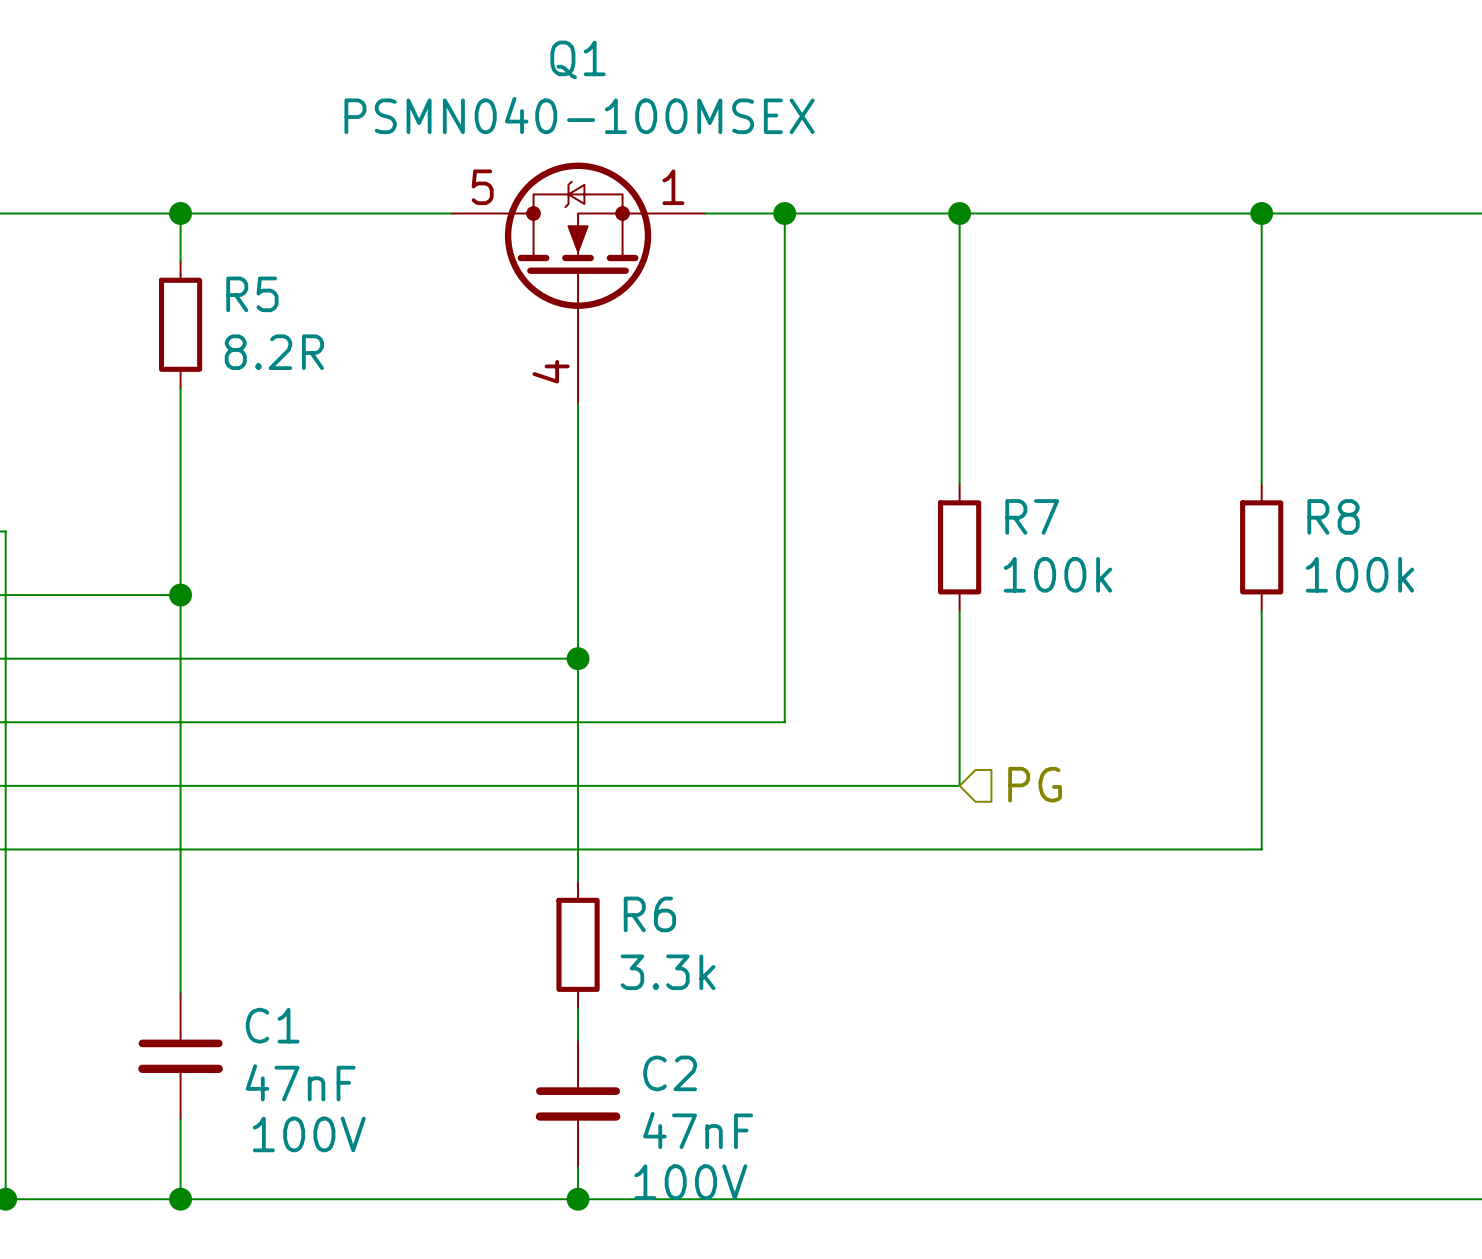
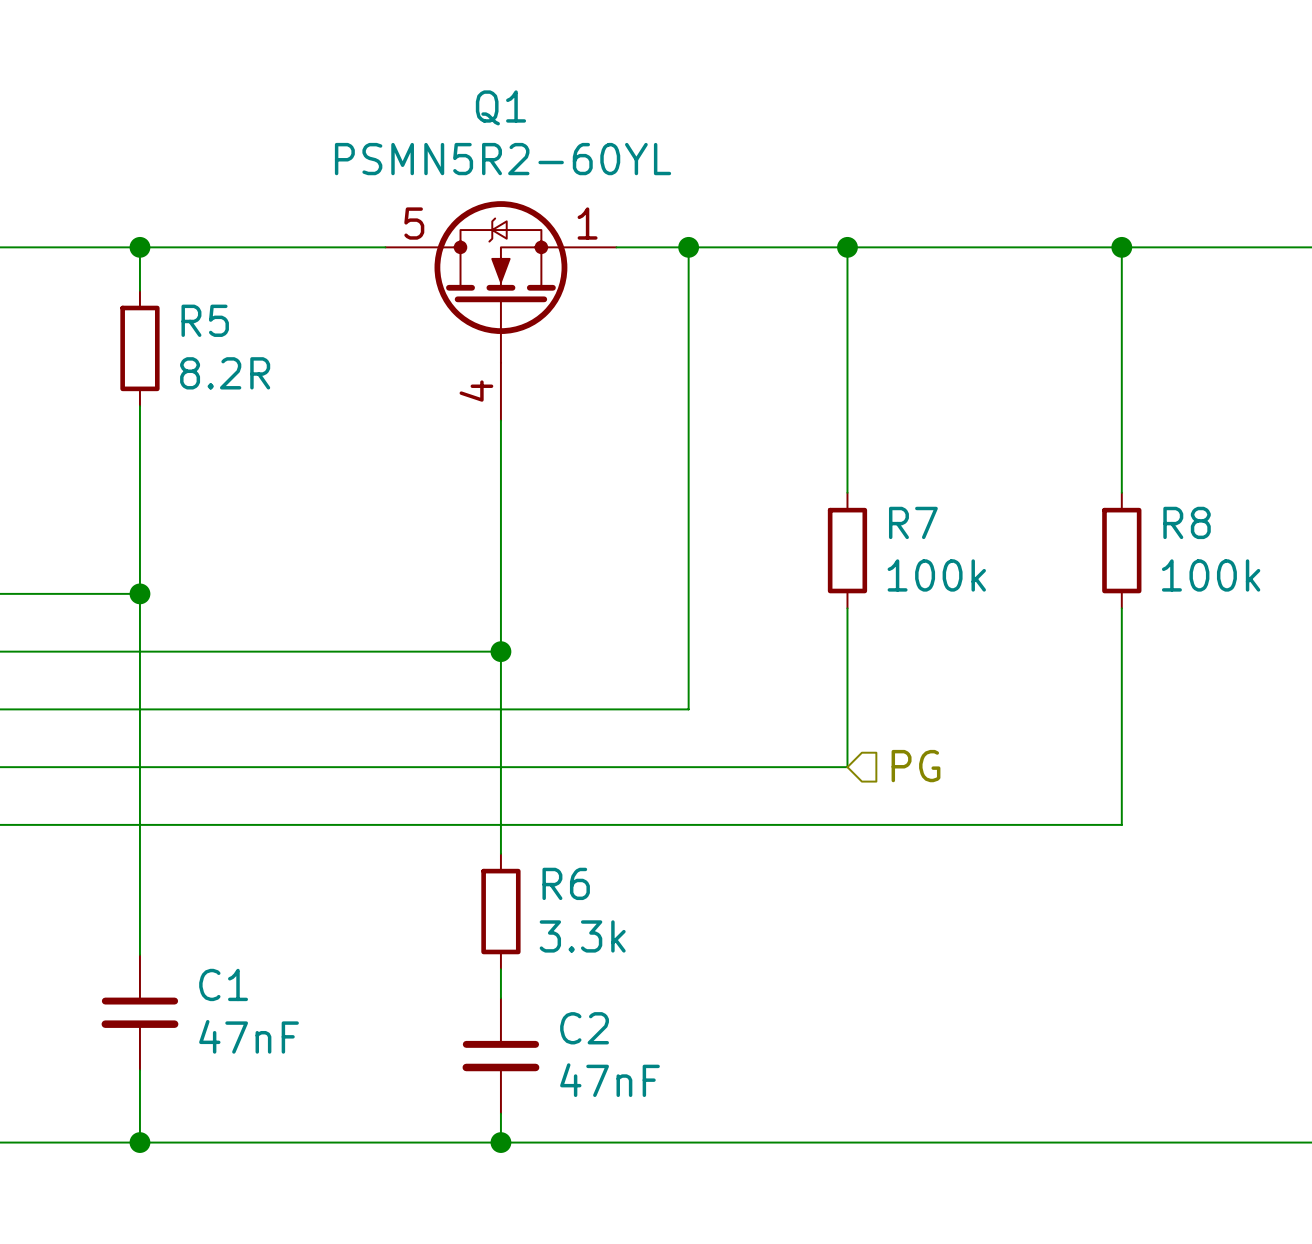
Q1 value: PSMN040-100MSEX (579, 115) -> PSMN5R2-60YL (503, 159)
C1 text: 100V (309, 1134) -> none
C2 text: 100V (690, 1182) -> none

